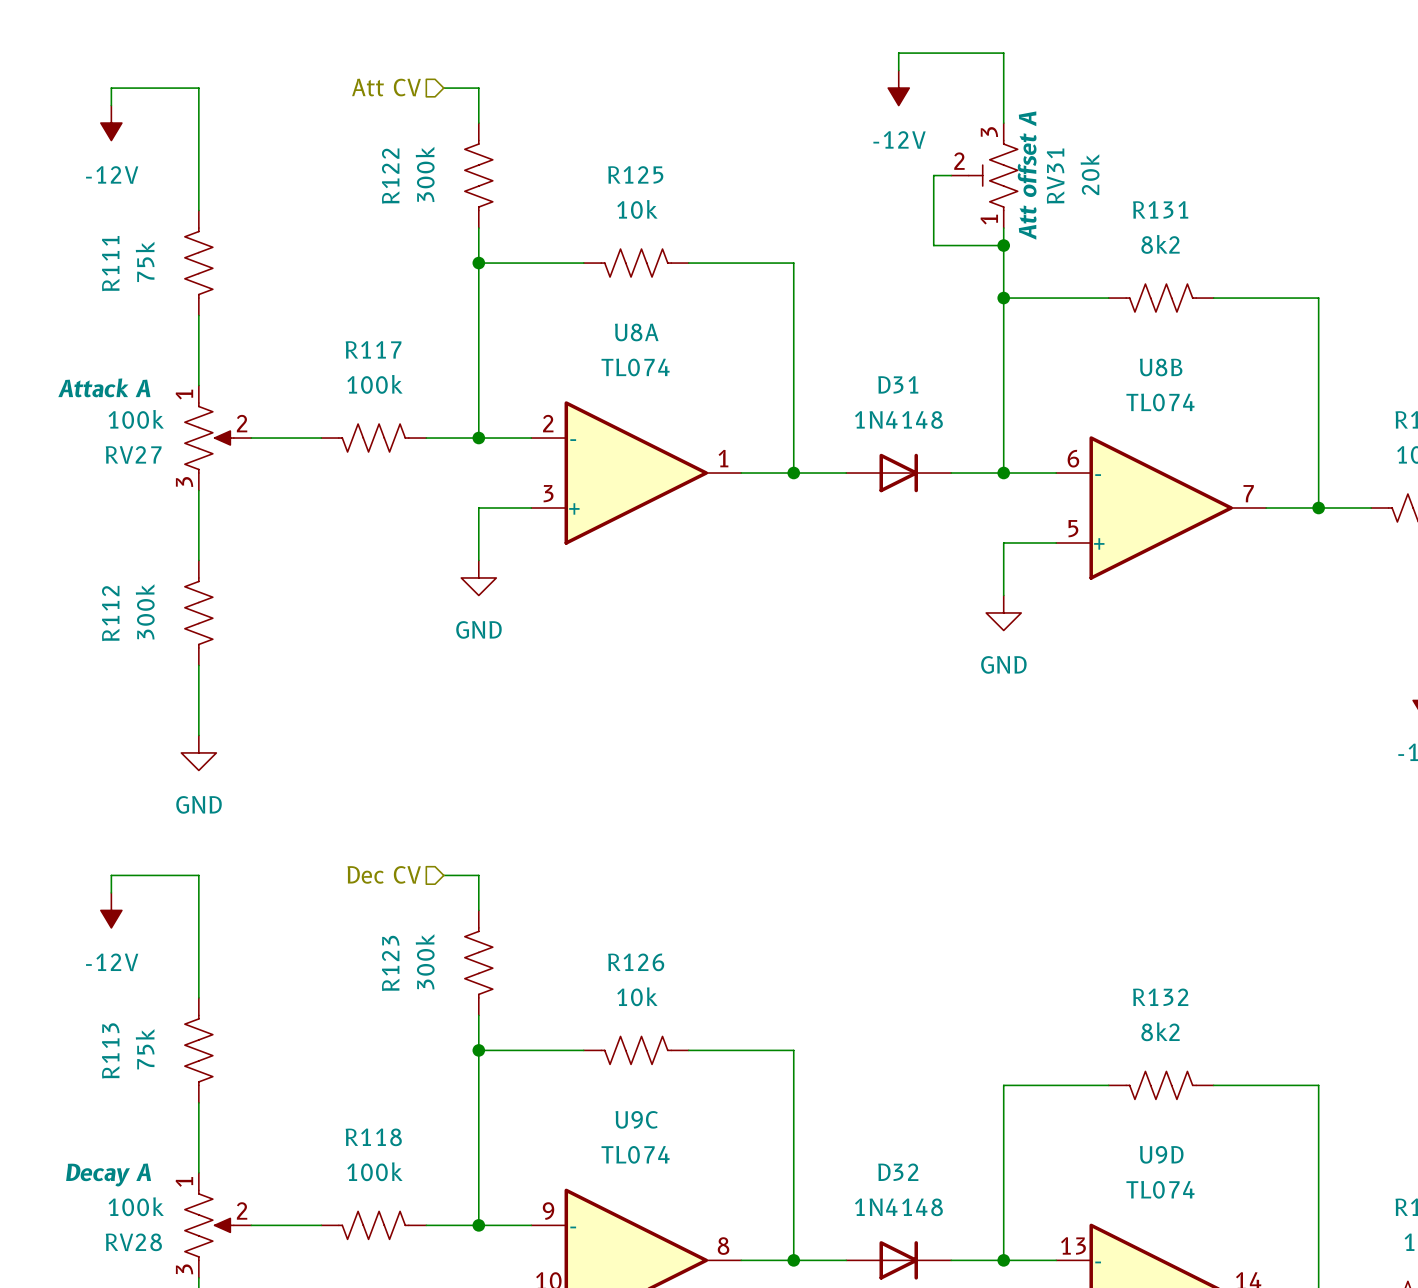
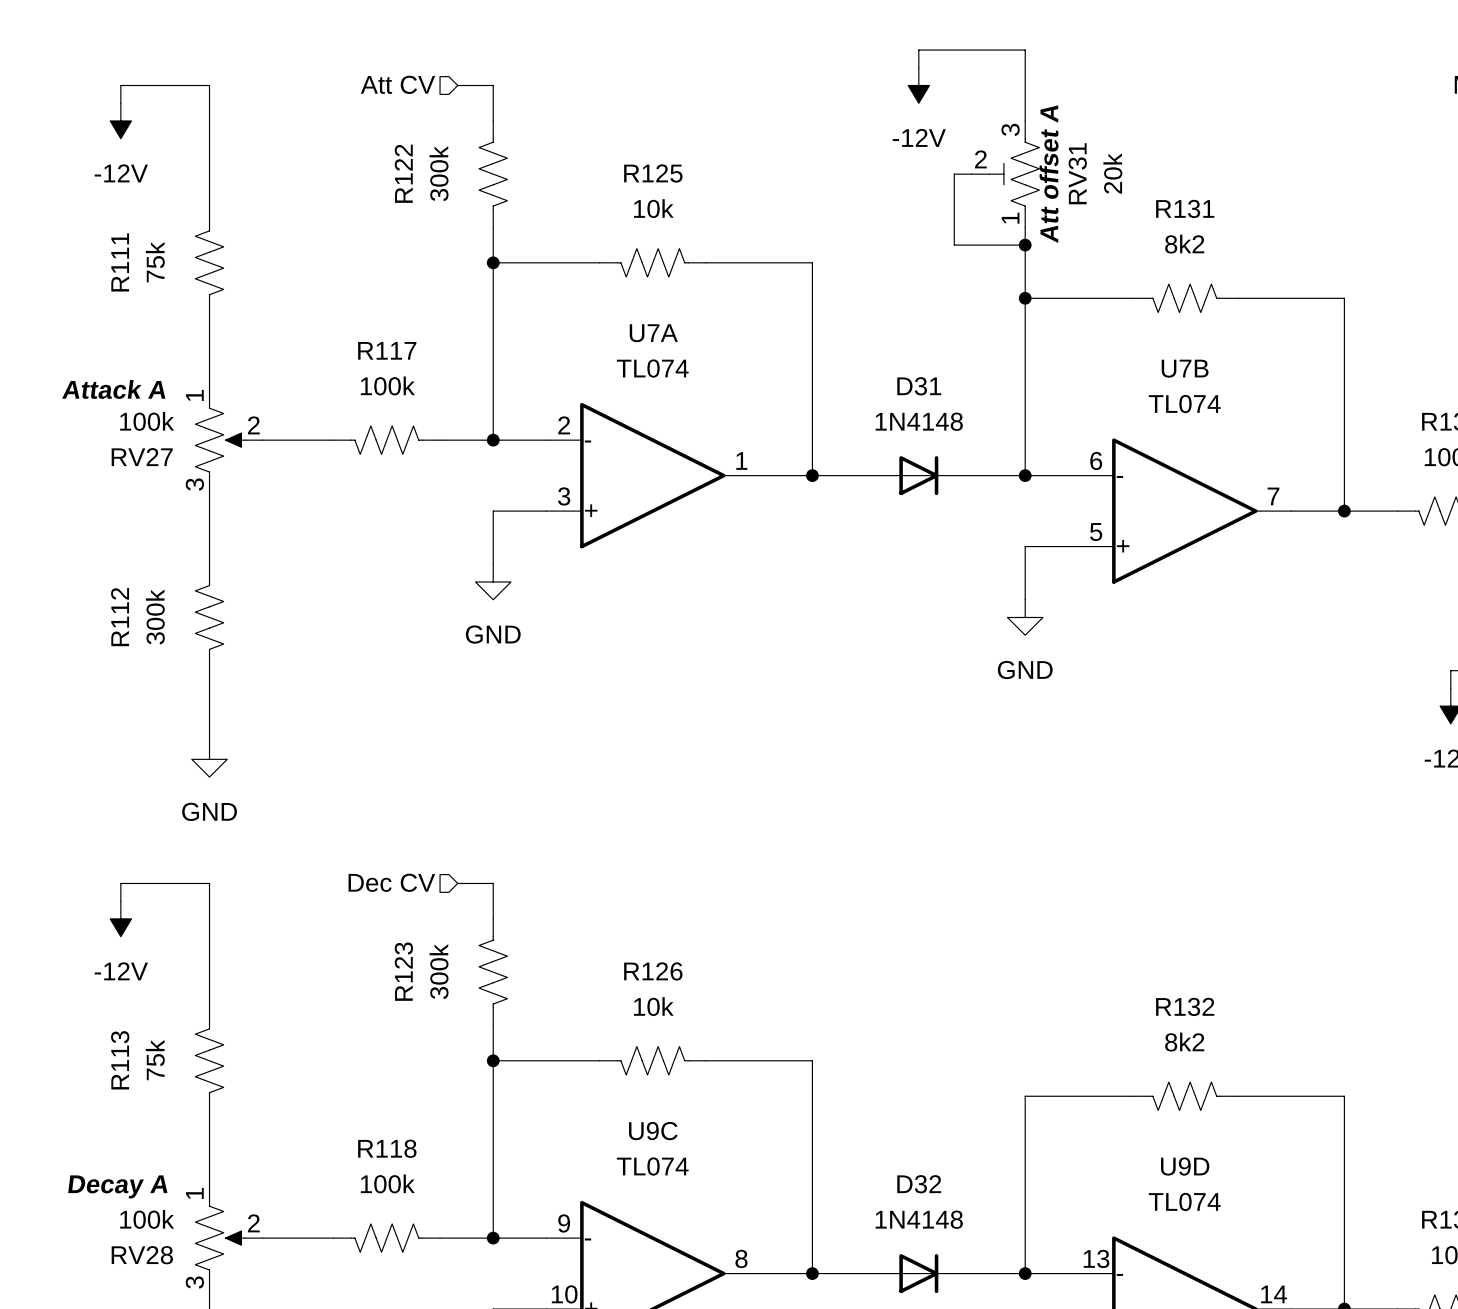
U8A name: U8A (636, 332) -> U7A (653, 333)
U8B name: U8B (1161, 367) -> U7B (1185, 368)

